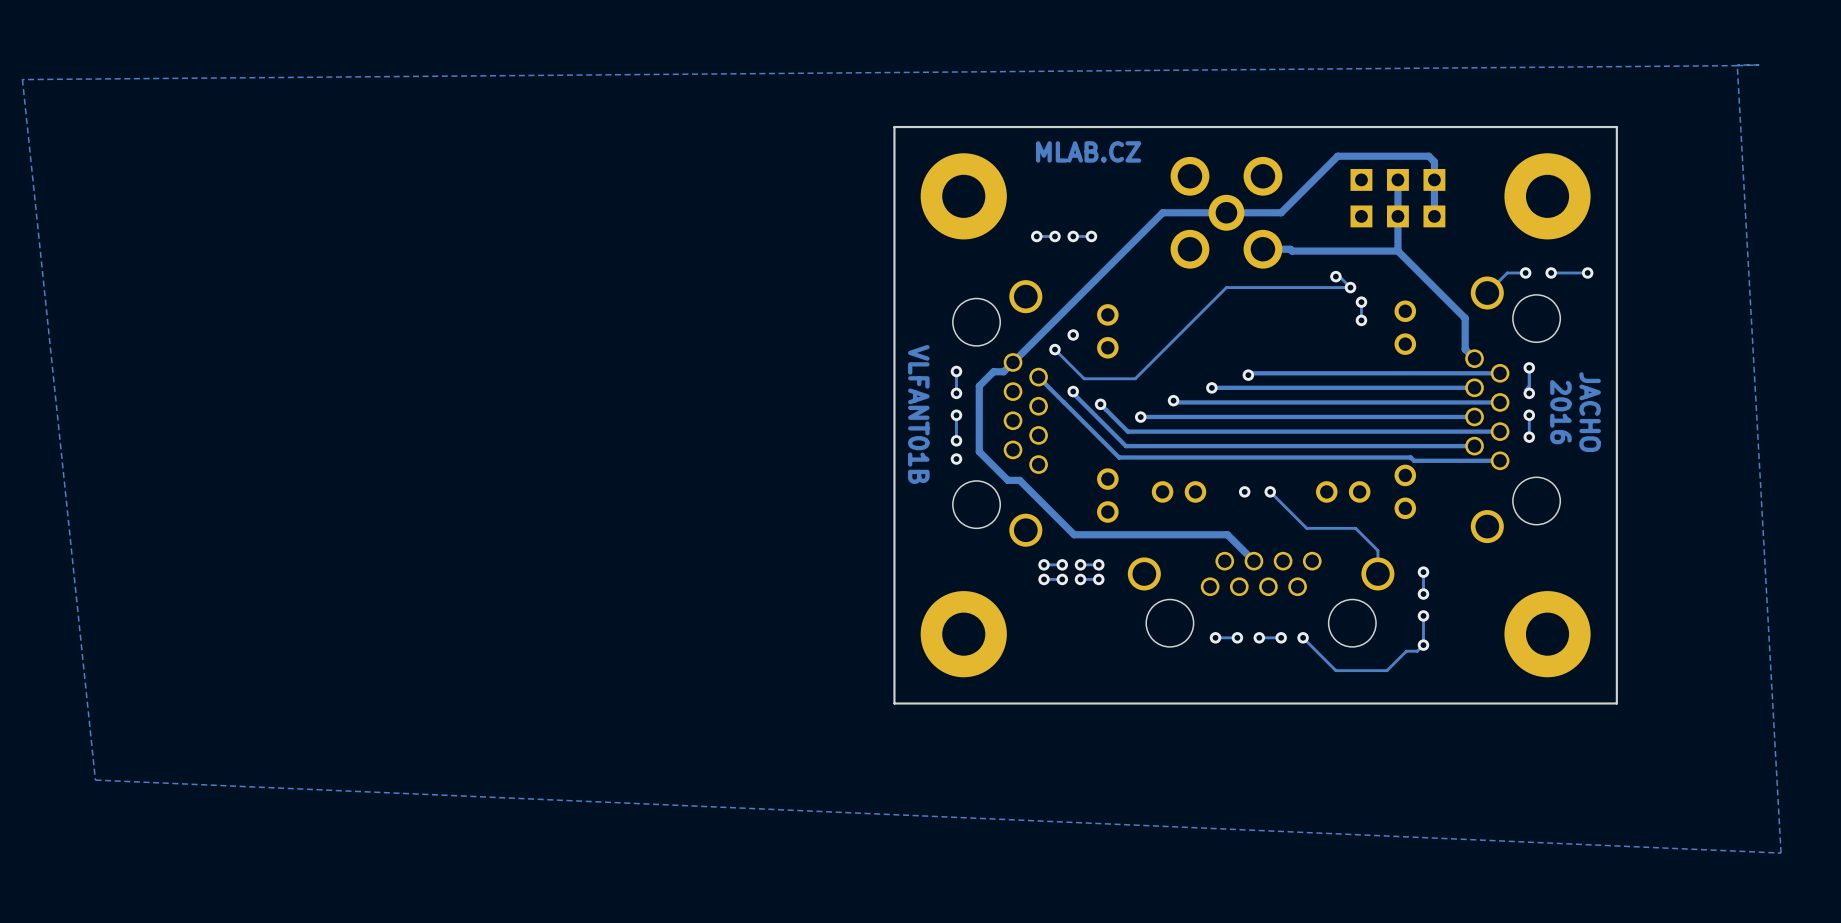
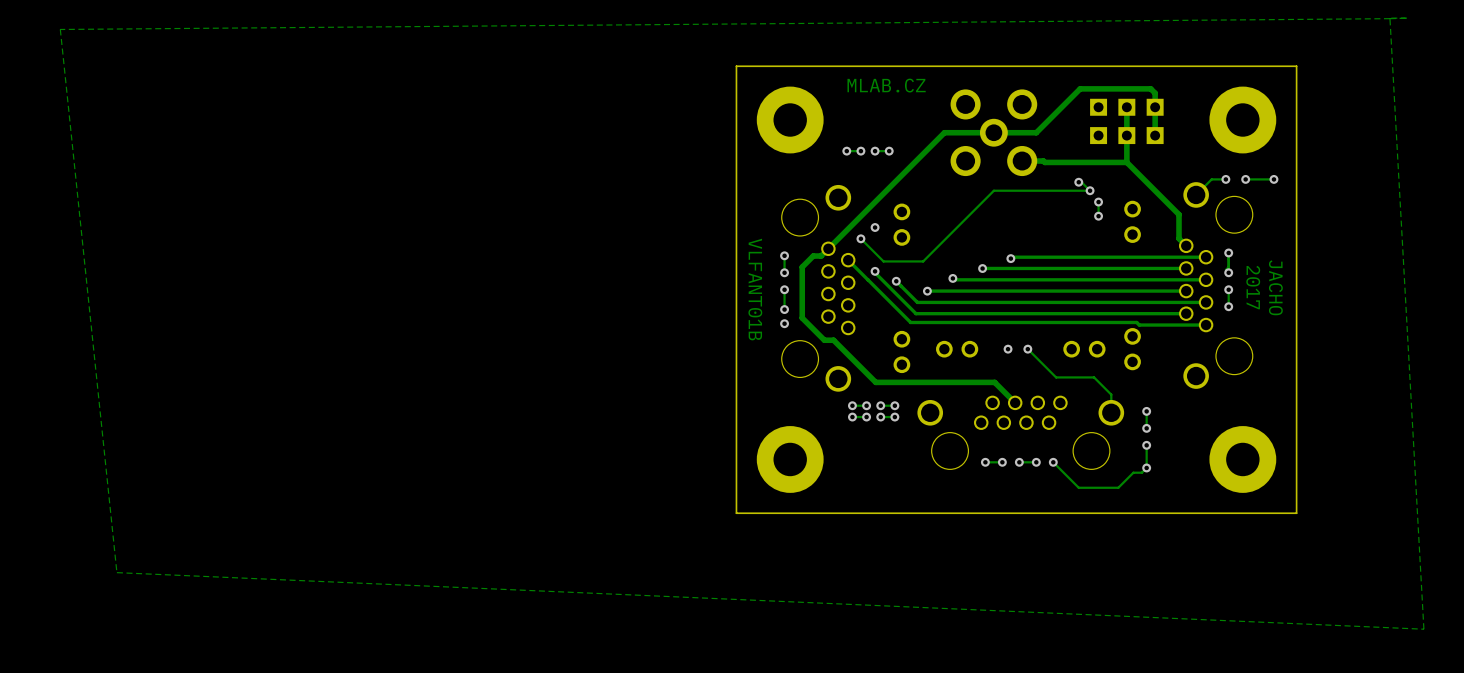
text: 2016 (1560, 412) -> 2017 (1253, 287)

